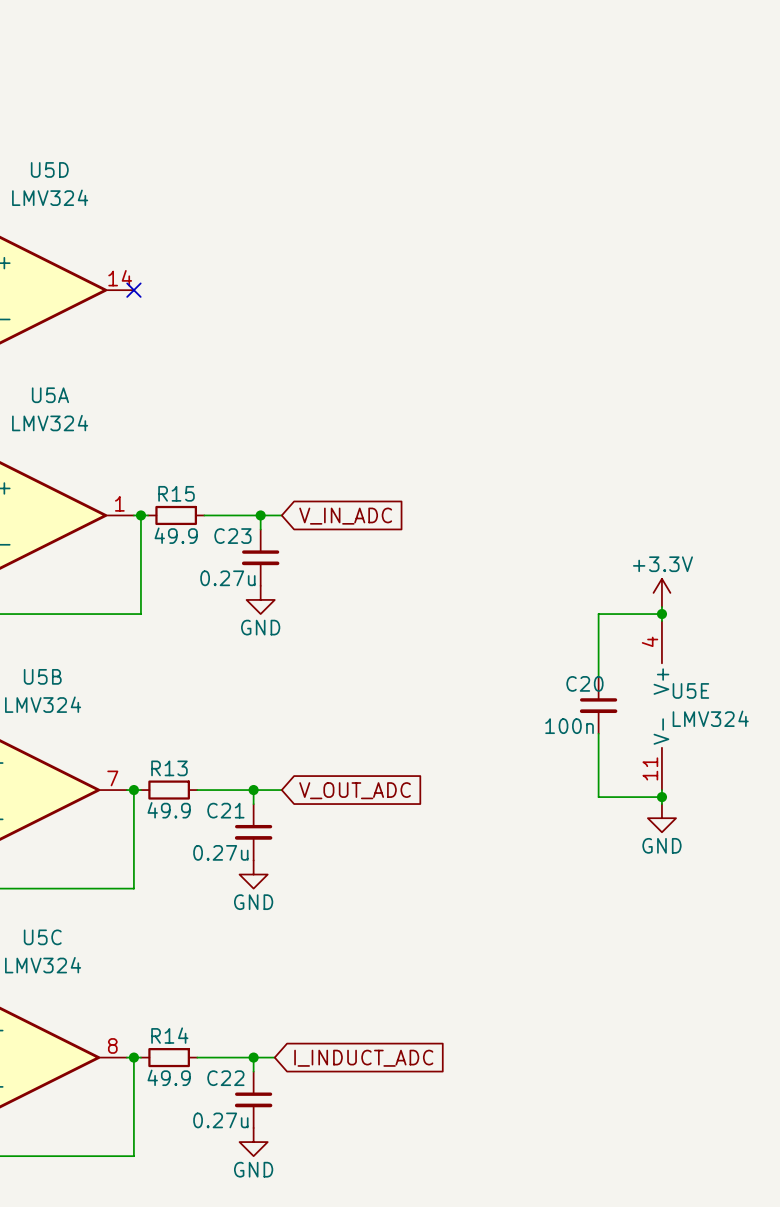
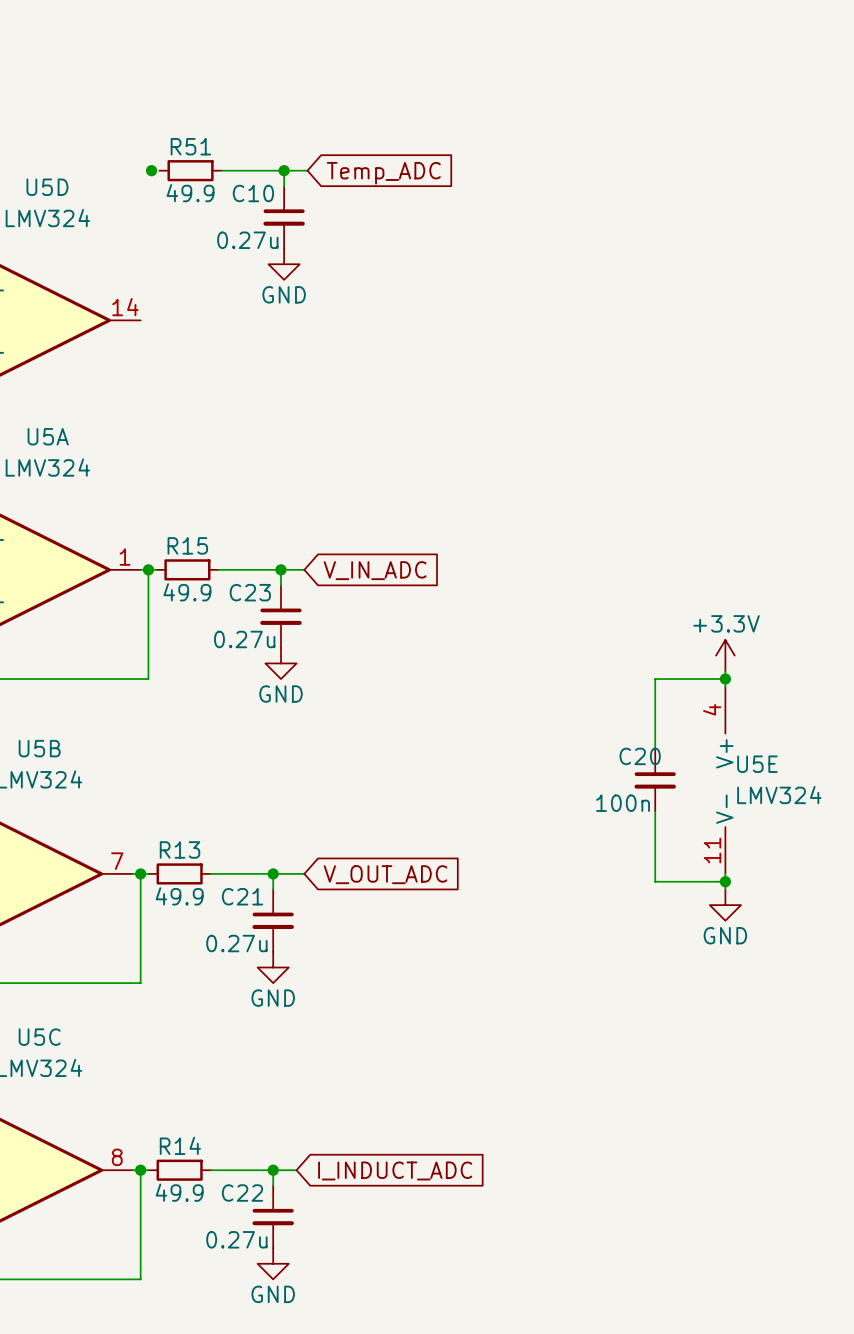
junction: none -> (151, 170)
R51: none -> 49.9 (190, 170)
wire: none -> (221, 170) (307, 170)
wire: none -> (284, 170) (284, 186)
junction: none -> (284, 170)
global label: none -> Temp_ADC (383, 173)
C10: none -> 0.27u (284, 217)
power symbol: none -> GND (284, 264)
no-connect mark: (133, 290) -> none

